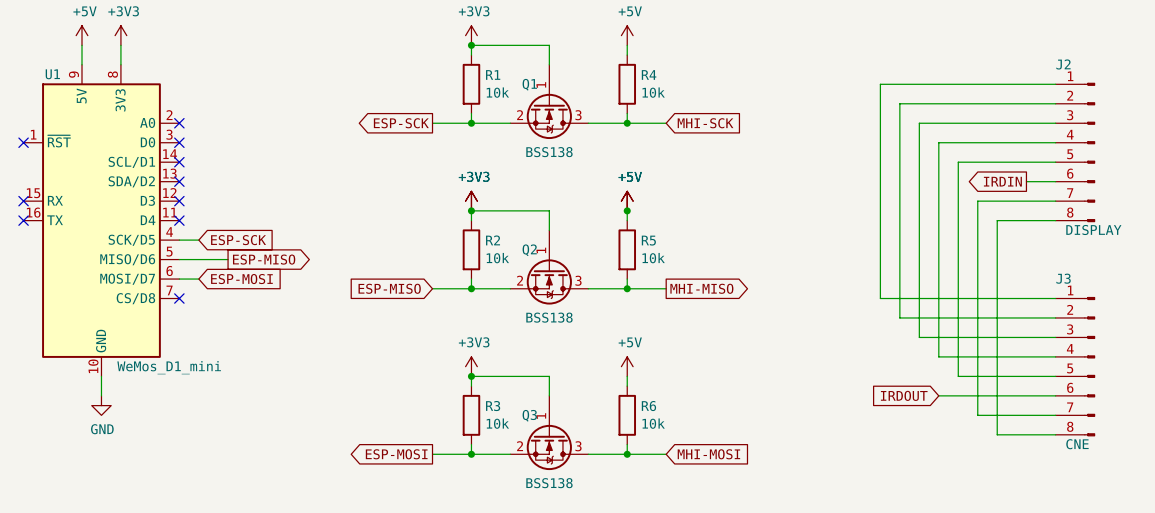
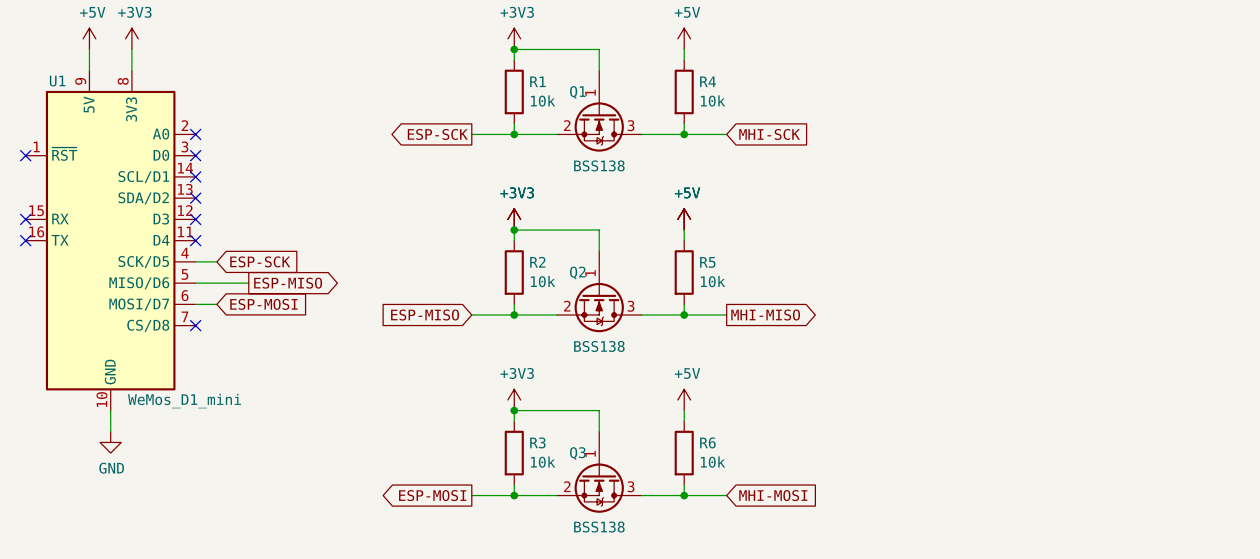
wire: (1055, 84) (880, 84) (880, 298) (1055, 298) -> none
wire: (1055, 103) (899, 103) (899, 317) (1055, 317) -> none
wire: (1055, 123) (919, 123) (919, 337) (1055, 337) -> none
wire: (1055, 142) (938, 142) (938, 356) (1055, 356) -> none
J2: DISPLAY (1075, 152) -> none
wire: (1055, 162) (958, 162) (958, 376) (1055, 376) -> none
global label: IRDIN (1002, 181) -> none
wire: (1026, 181) (1055, 181) -> none
wire: (1055, 201) (977, 201) (977, 415) (1055, 415) -> none
junction: (627, 210) -> none
wire: (1055, 220) (997, 220) (997, 434) (1055, 434) -> none
J3: CNE (1075, 366) -> none
global label: IRDOUT (904, 395) -> none
wire: (938, 395) (1055, 395) -> none

